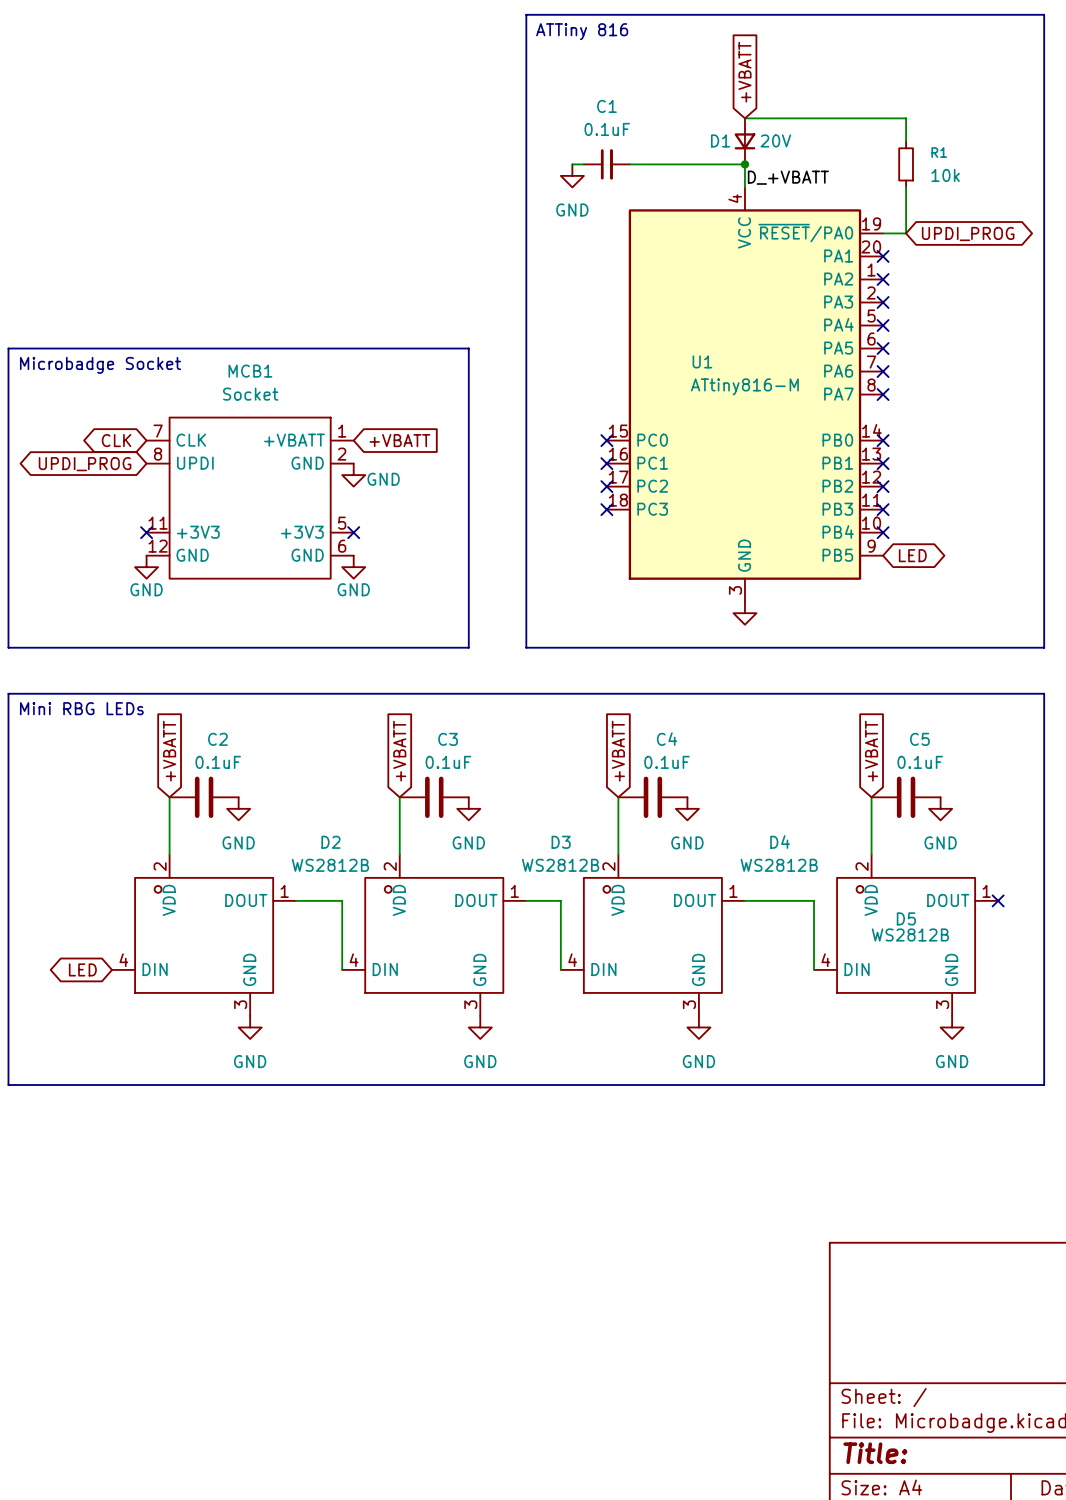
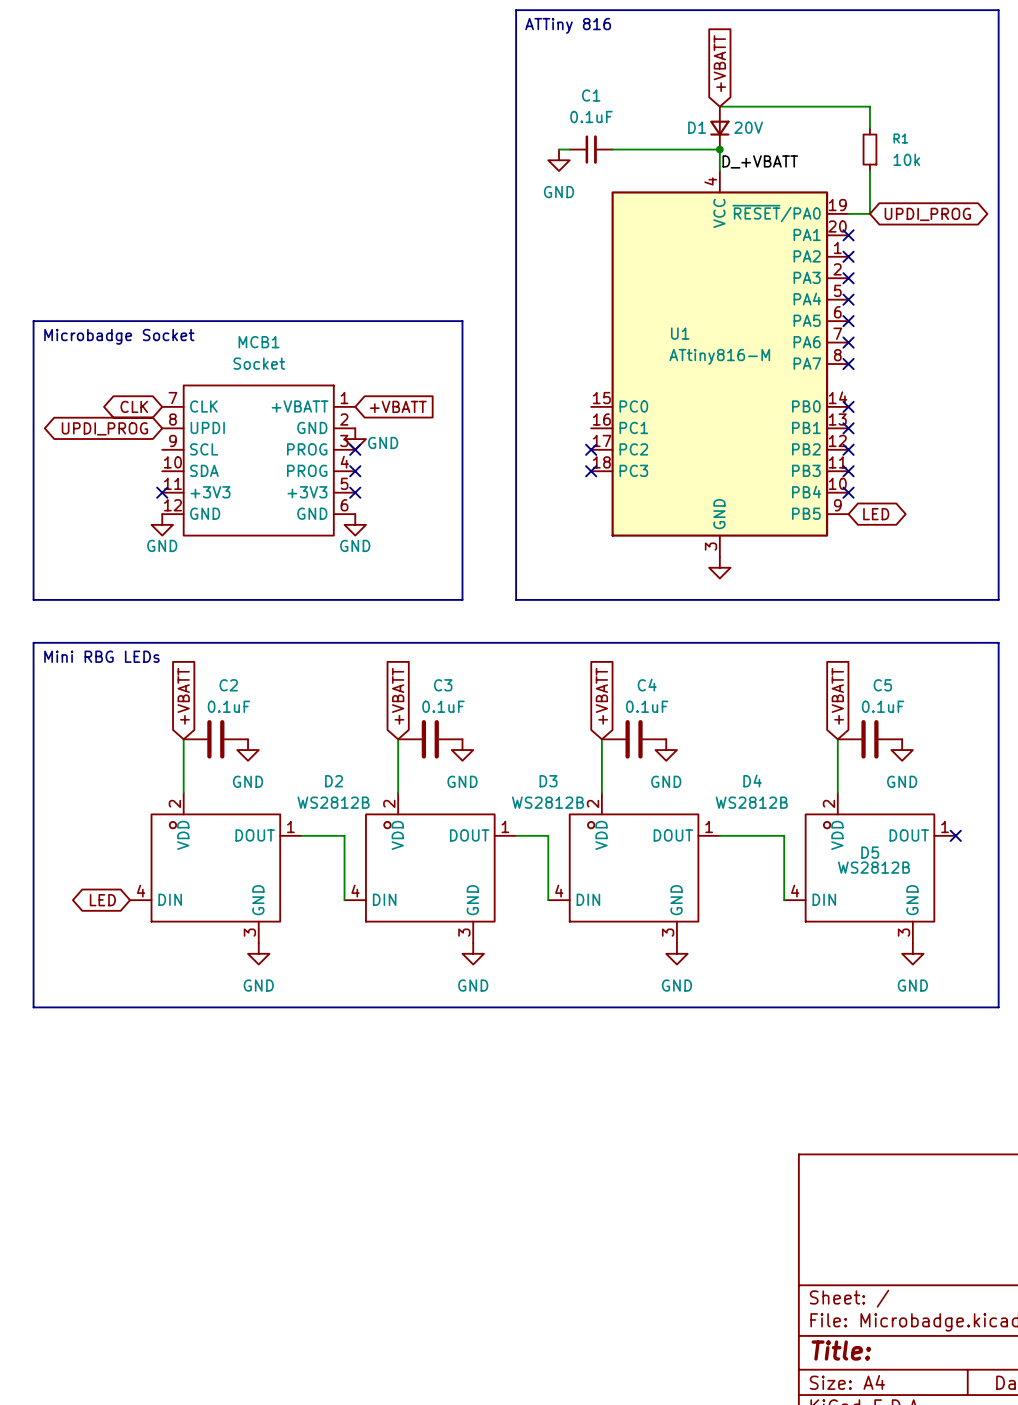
MCB1 symbol: [146, 417, 354, 579] -> [162, 385, 356, 536]
no-connect mark: (606, 440) -> none
no-connect mark: (606, 463) -> none
no-connect mark: none -> (355, 449)
no-connect mark: none -> (355, 471)

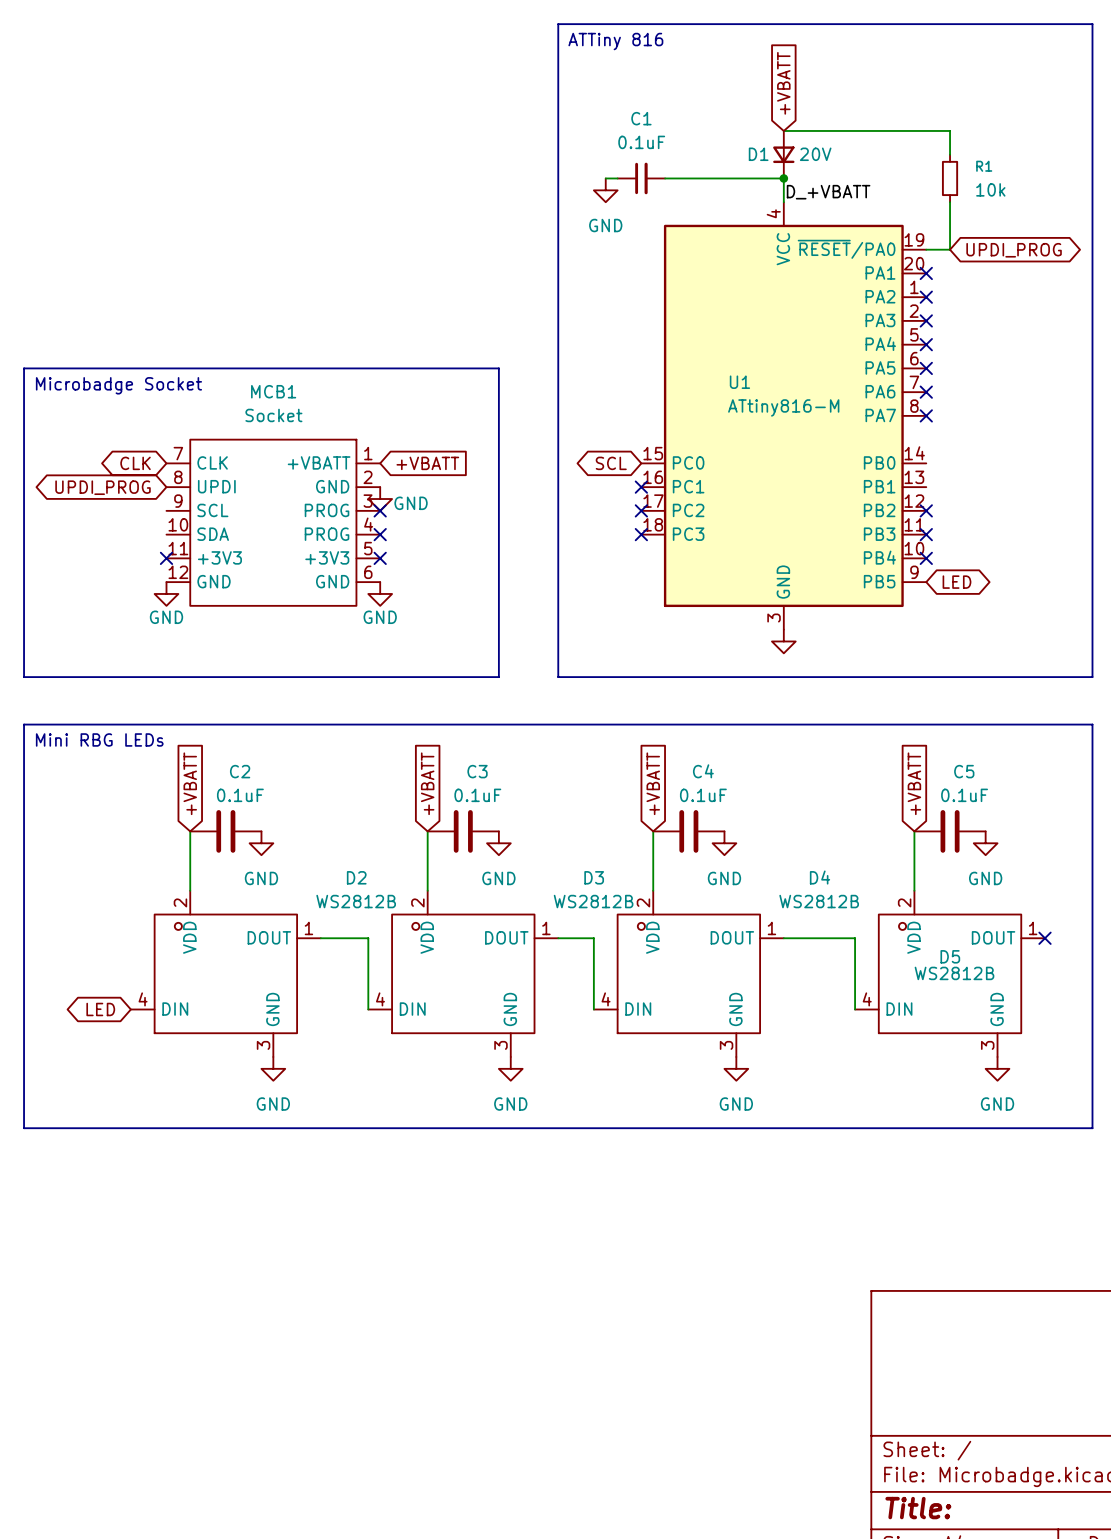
global label: none -> SCL (611, 463)
no-connect mark: (848, 406) -> none
no-connect mark: none -> (641, 487)
no-connect mark: (848, 428) -> none

